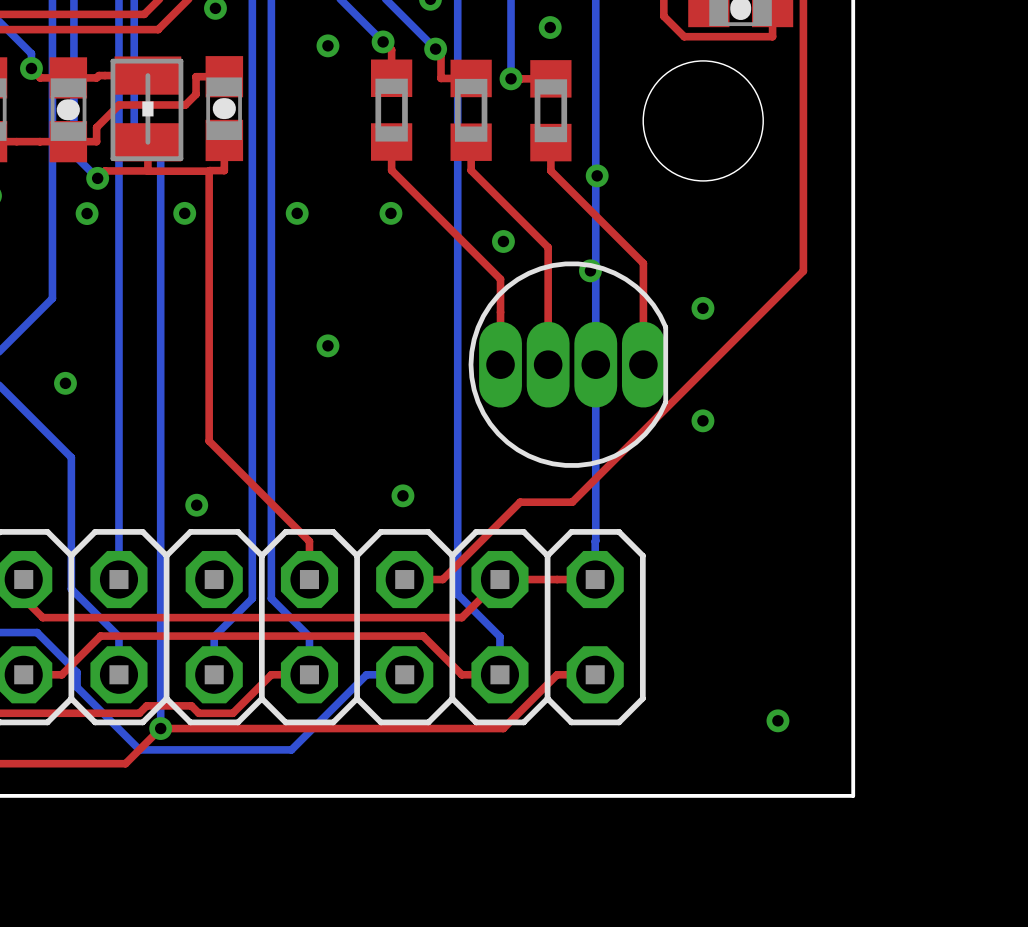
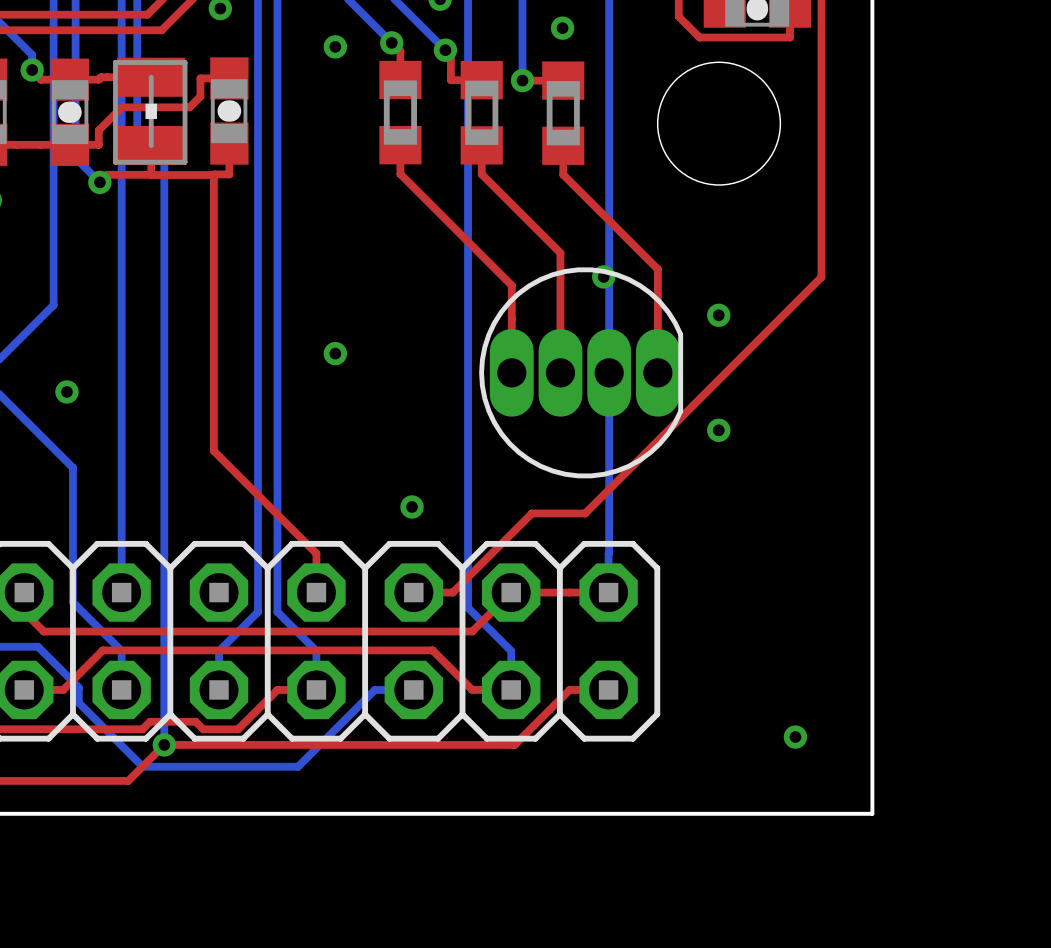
via: (597, 175) -> none
via: (87, 213) -> none
via: (184, 213) -> none
via: (297, 213) -> none
via: (390, 213) -> none
via: (503, 241) -> none
via: (196, 505) -> none

